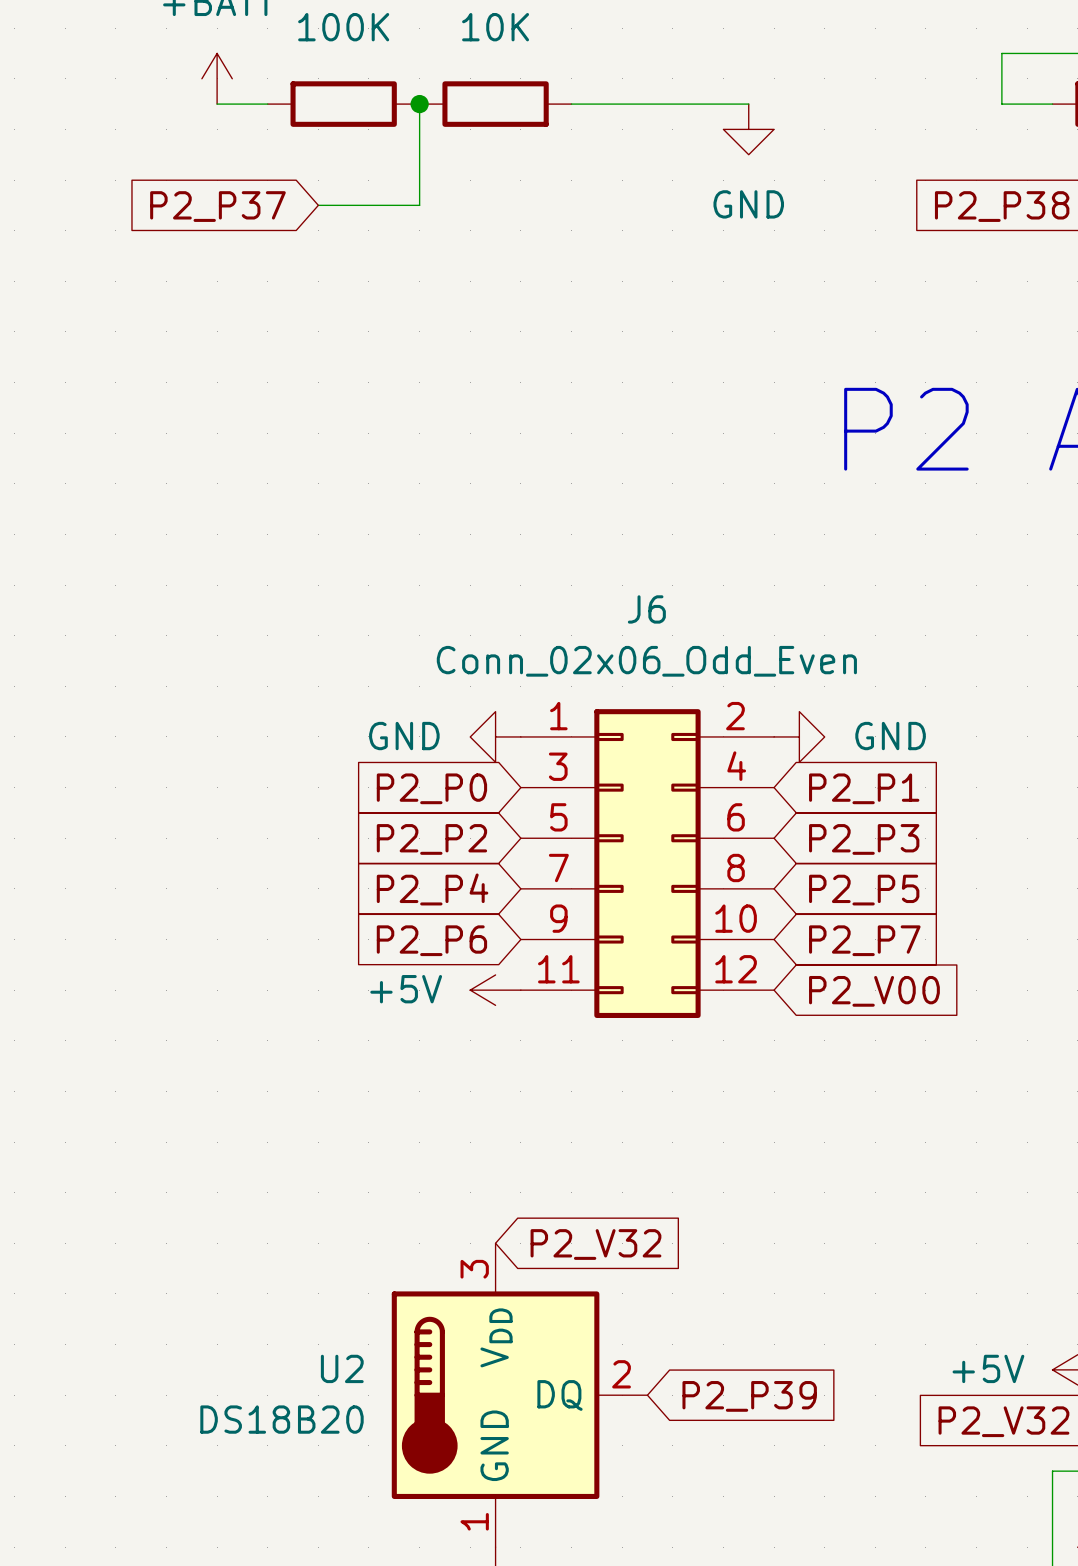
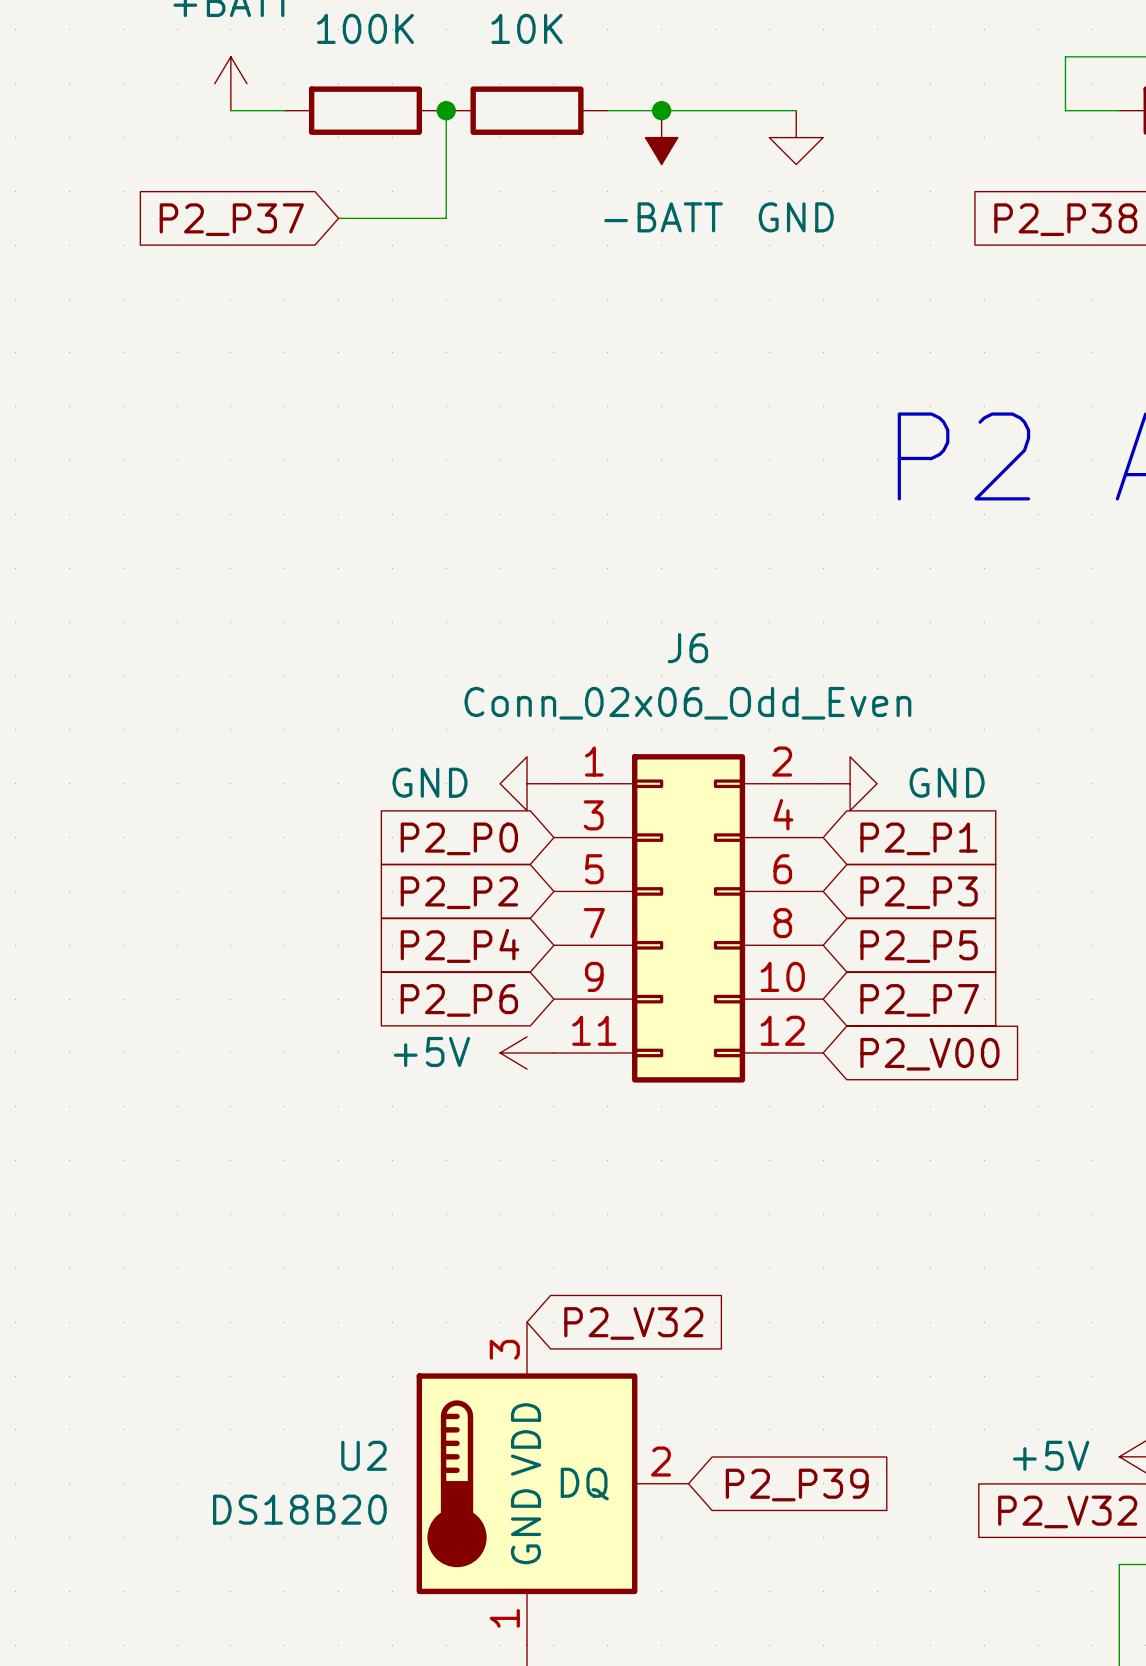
junction: none -> (661, 110)
power symbol: none -> -BATT (661, 137)
U2 symbol: [391, 1243, 648, 1548] -> [416, 1322, 689, 1646]

